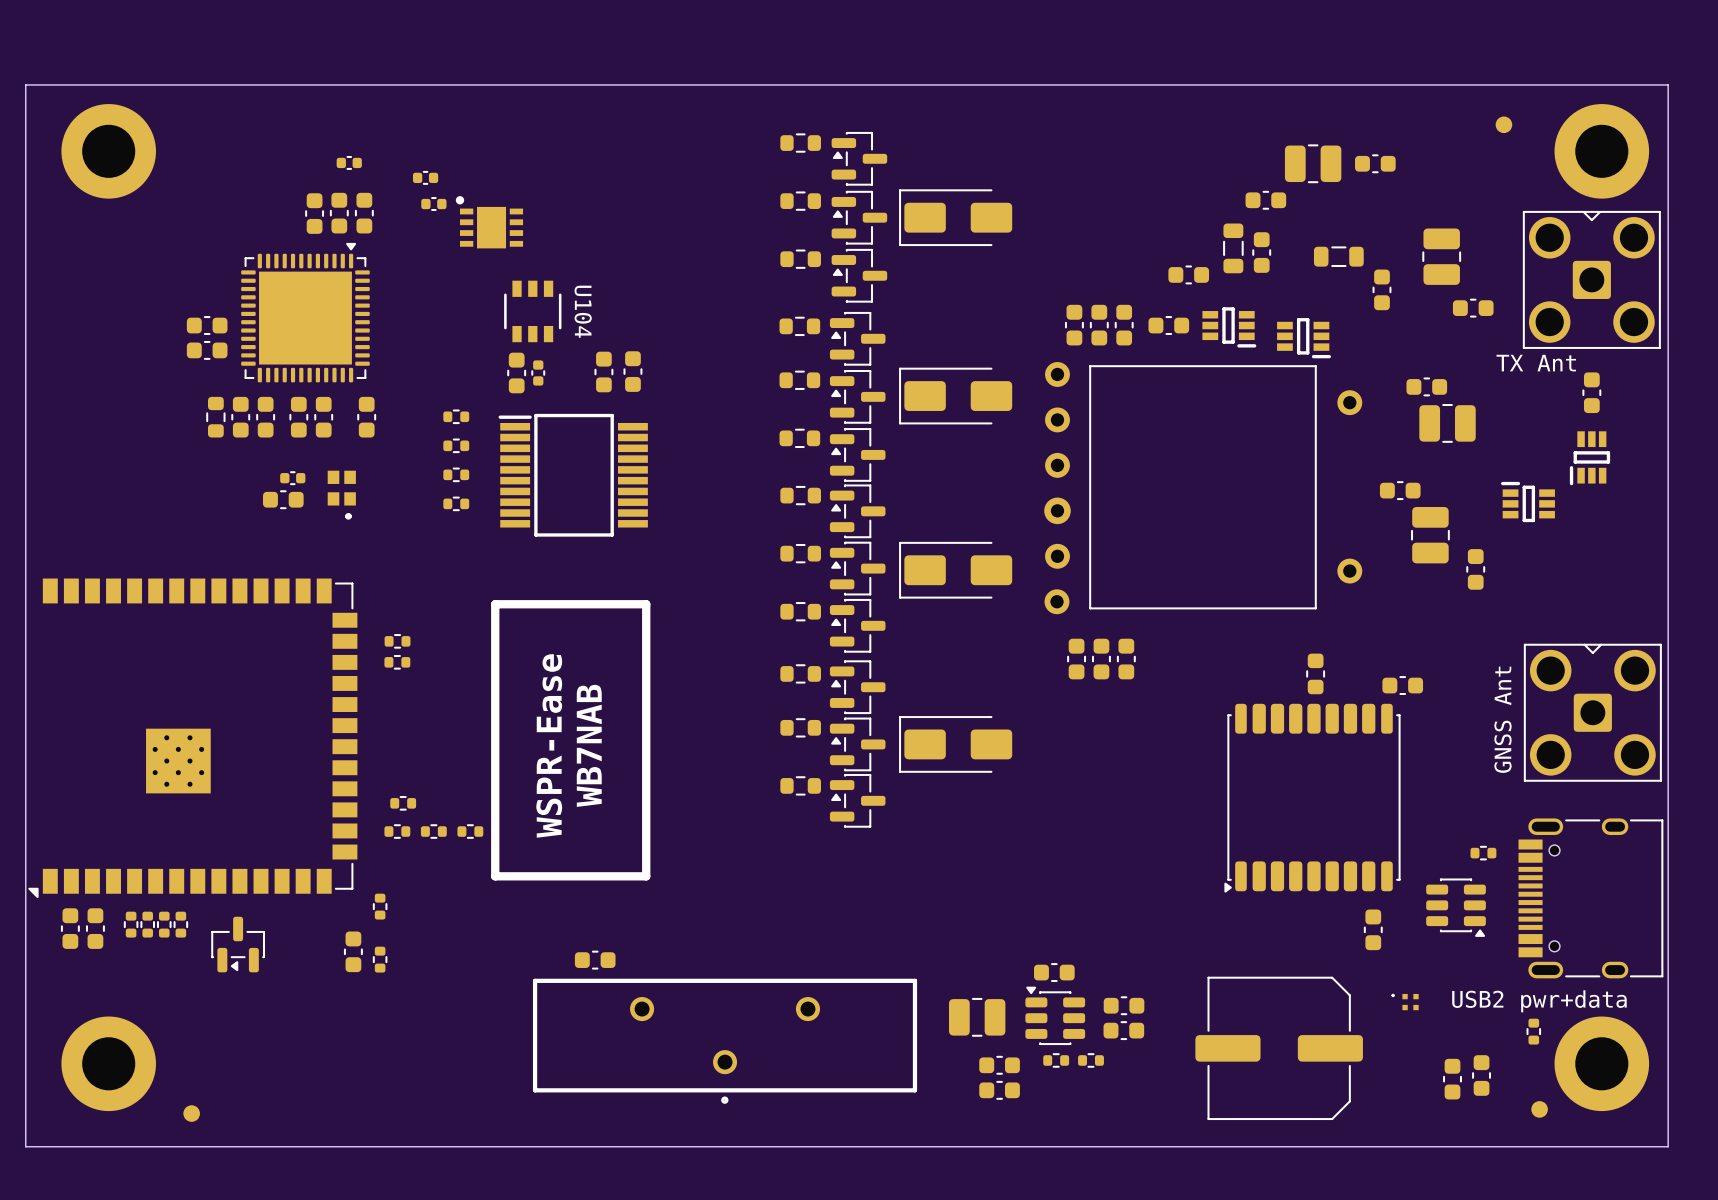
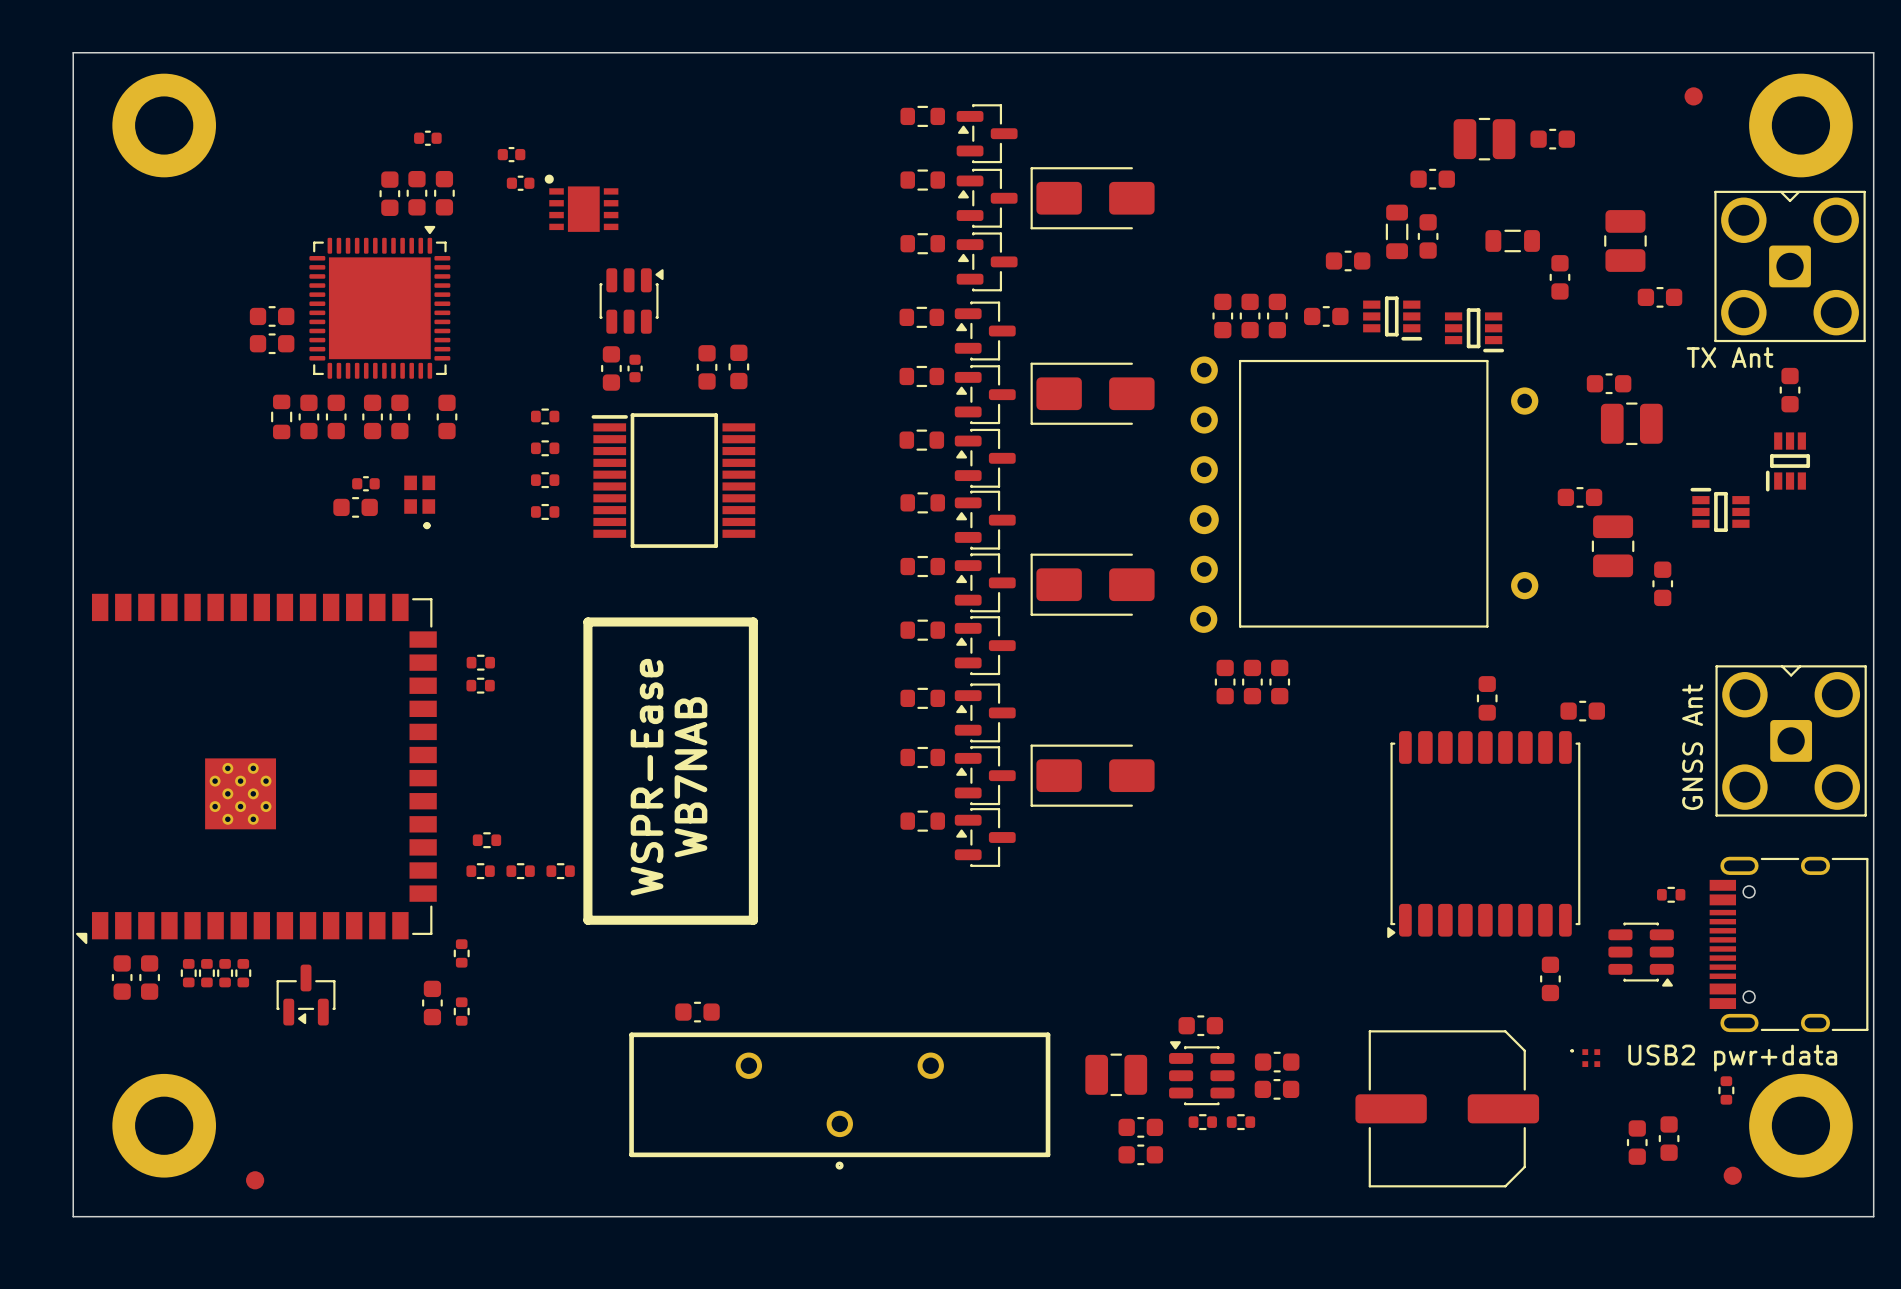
U104: (532, 311) -> none
part: none -> (631, 301)

